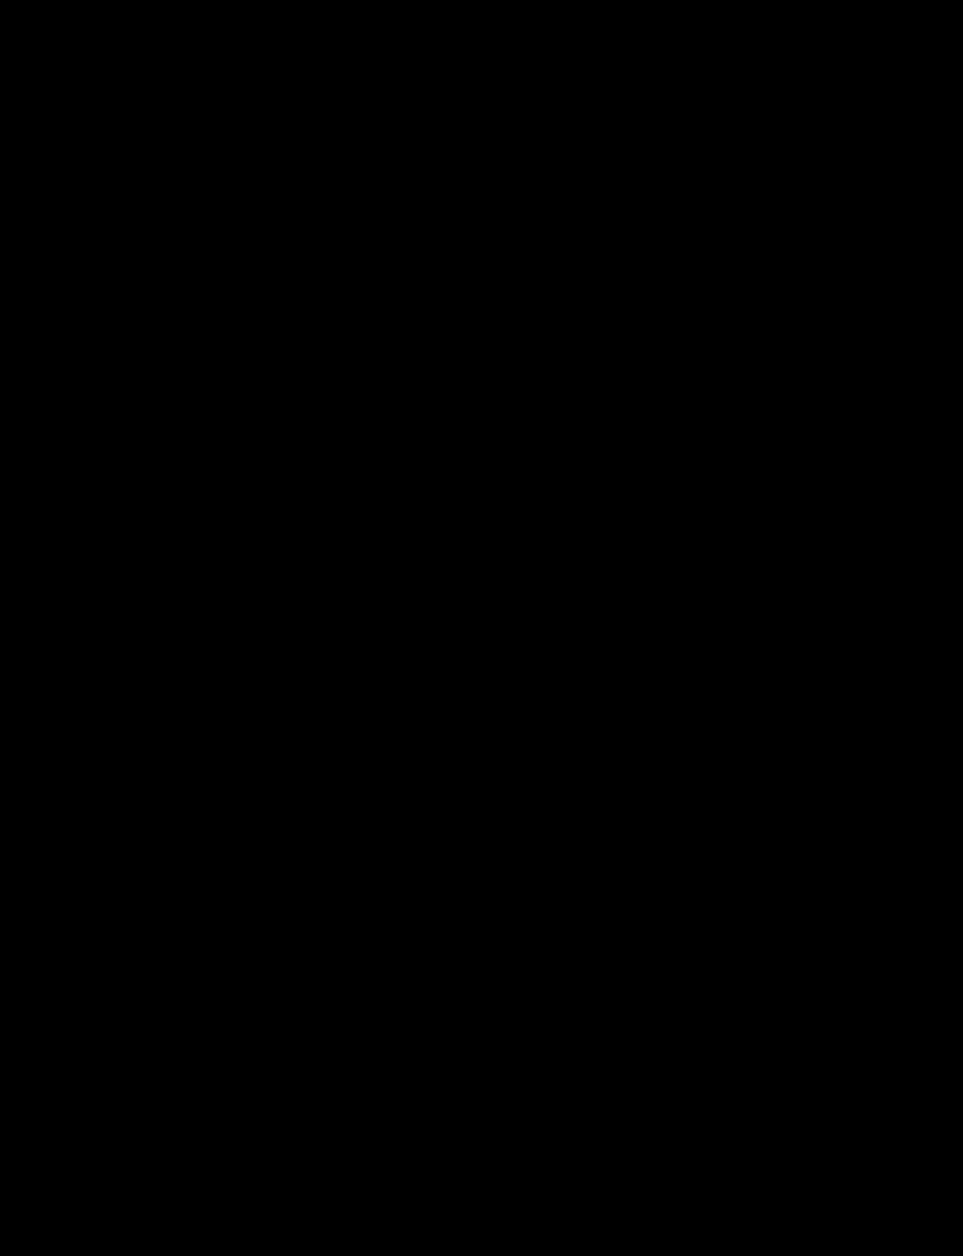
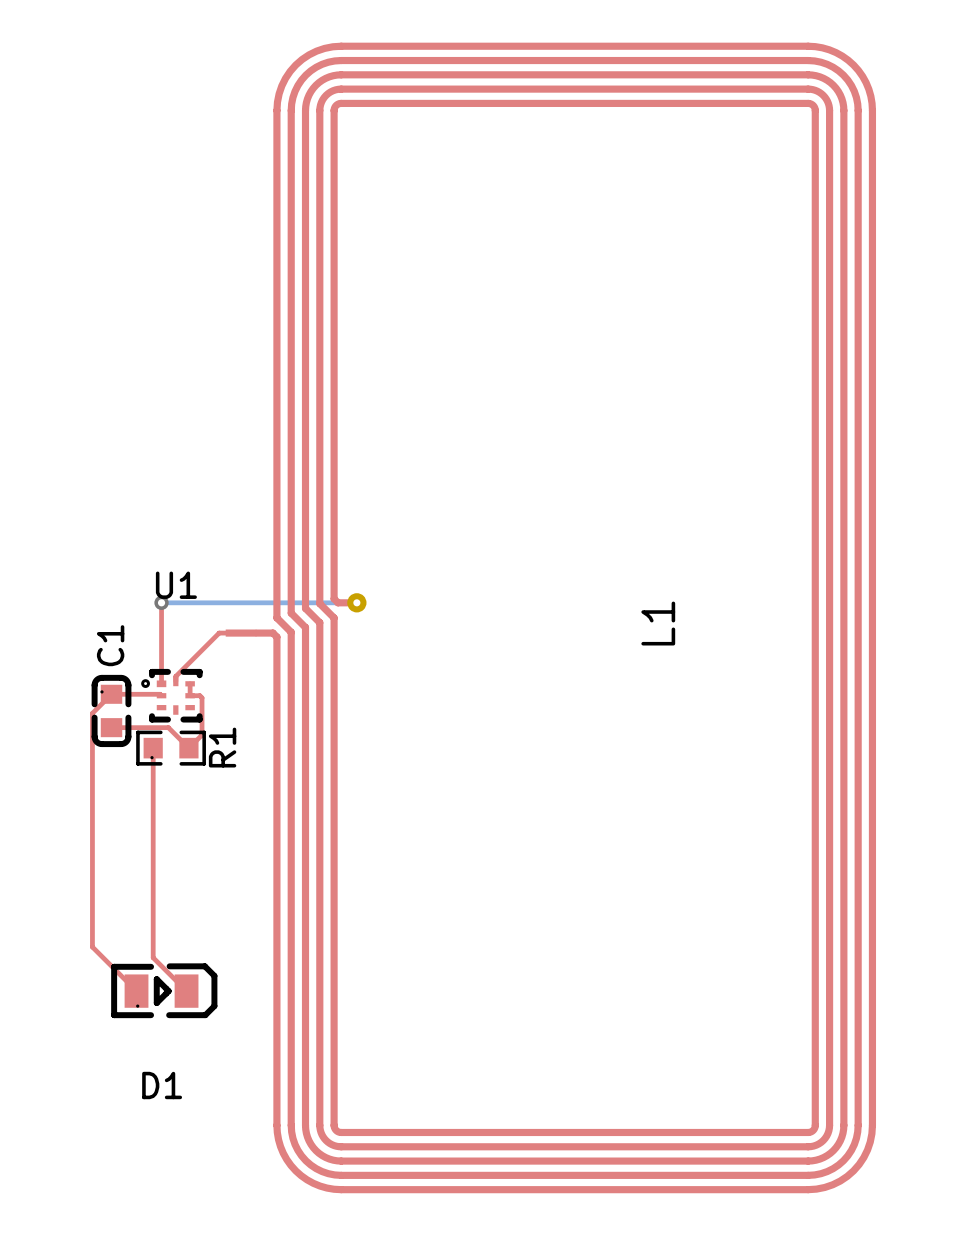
top track: none -> (161, 602) (161, 683)
bottom track: none -> (161, 602) (356, 602)
via: none -> (161, 602)
L1: none -> (550, 617)
top track: none -> (241, 633) (219, 633) (175, 676) (175, 681)
top track: none -> (190, 683) (190, 695) (199, 695) (202, 697) (202, 735) (188, 748) (168, 727) (111, 727)
top track: none -> (161, 695) (111, 694) (92, 713) (92, 947) (136, 991)
U1: none -> (171, 695)
C1: none -> (111, 710)
top track: none -> (153, 748) (153, 957) (186, 991)
R1: none -> (171, 748)
D1: none -> (164, 990)

